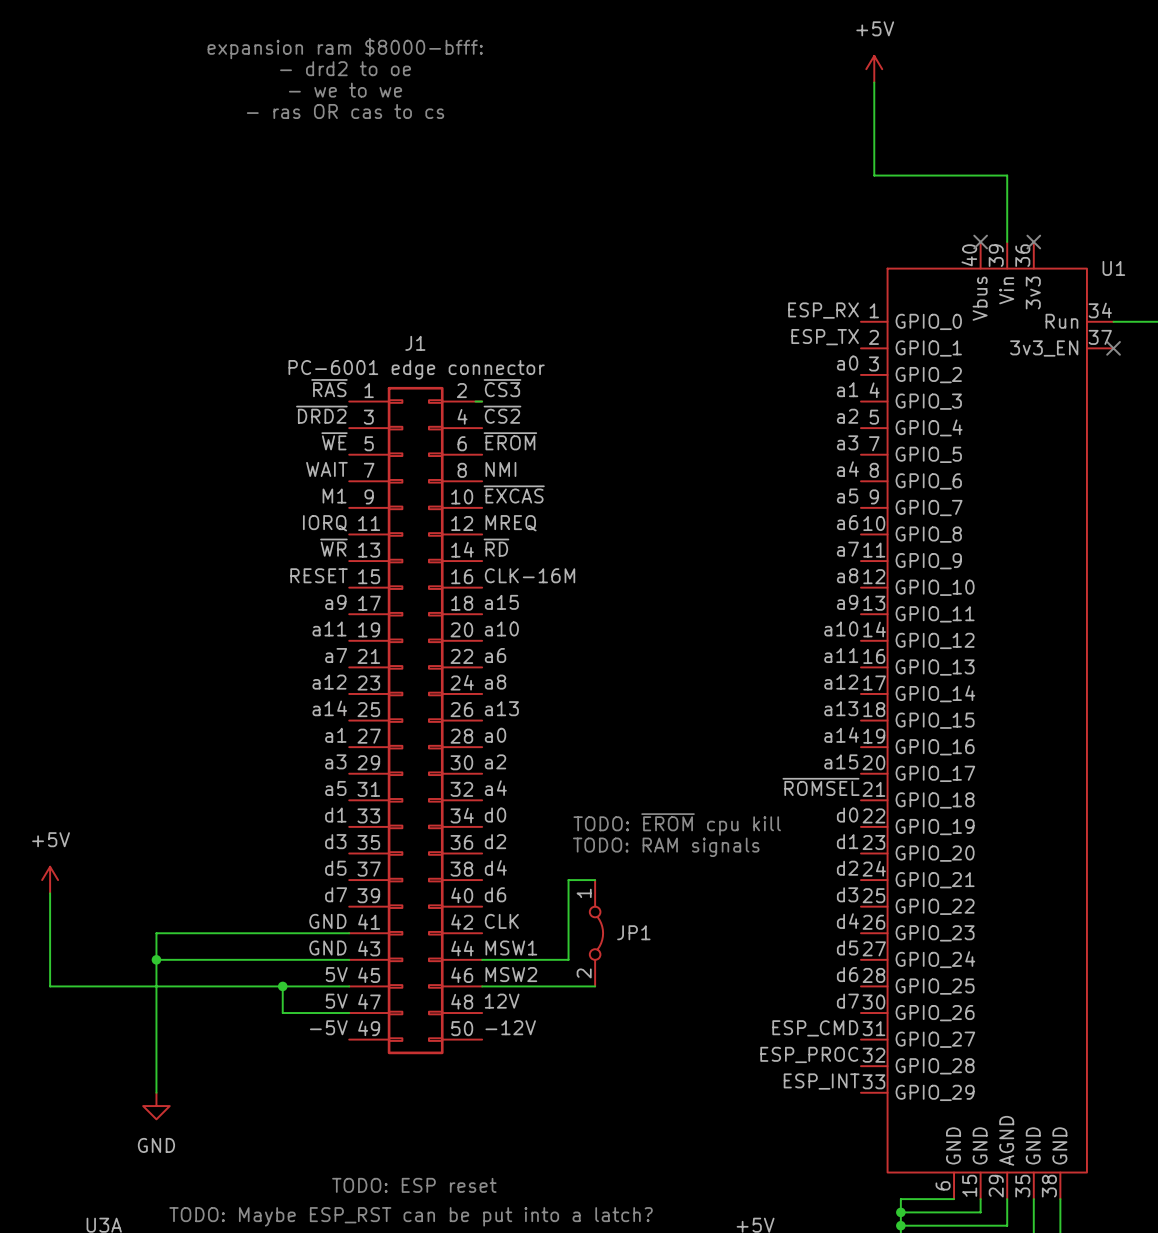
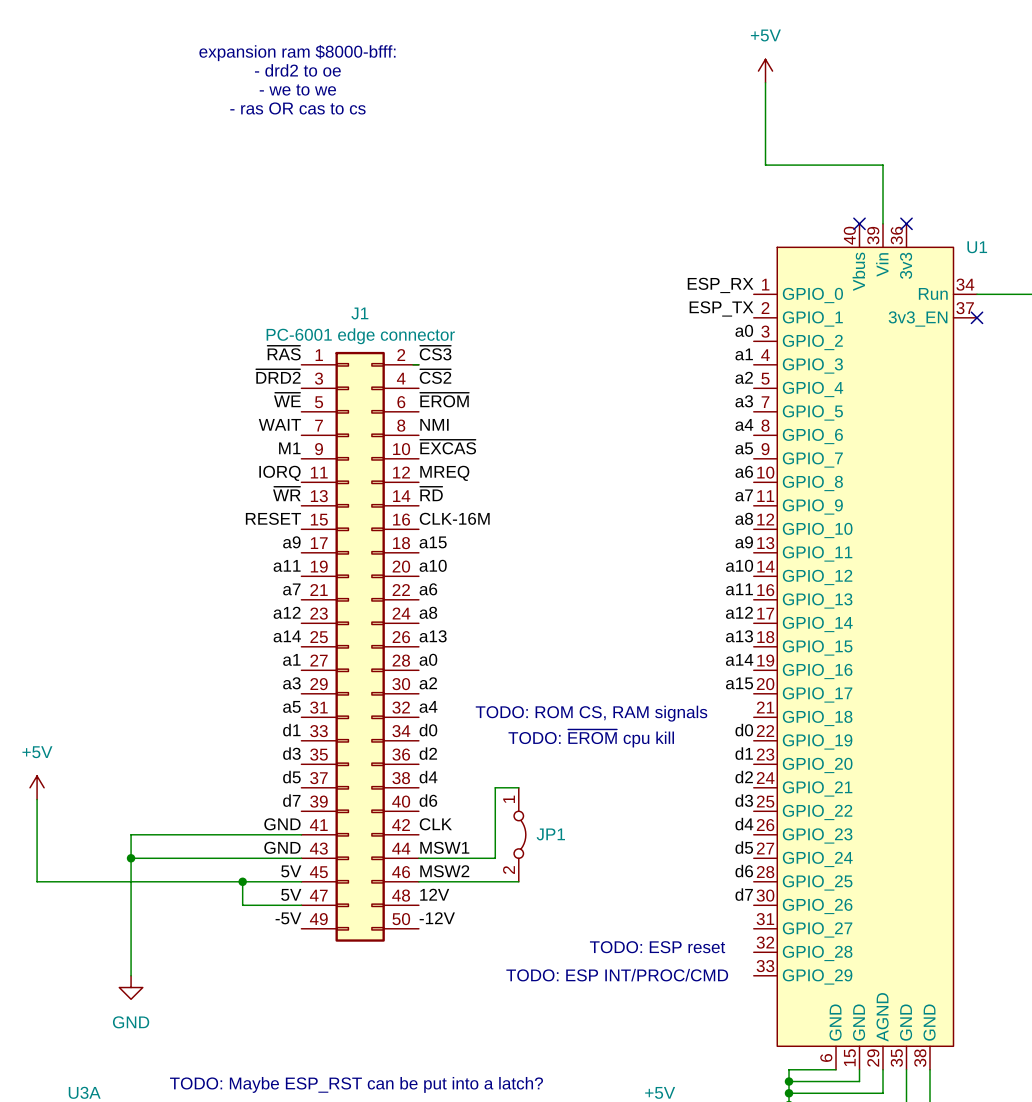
label: ~{ROMSEL} (821, 786) -> none
text: none -> TODO: ROM CS, RAM signals (591, 713)
text: TODO: RAM signals (666, 847) -> none
label: ESP_CMD (815, 1028) -> none
label: ESP_PROC (809, 1054) -> none
text: none -> TODO: ESP reset (657, 947)
label: ESP_INT (821, 1081) -> none
text: none -> TODO: ESP INT/PROC/CMD (617, 975)
text: TODO: ESP reset (414, 1185) -> none

